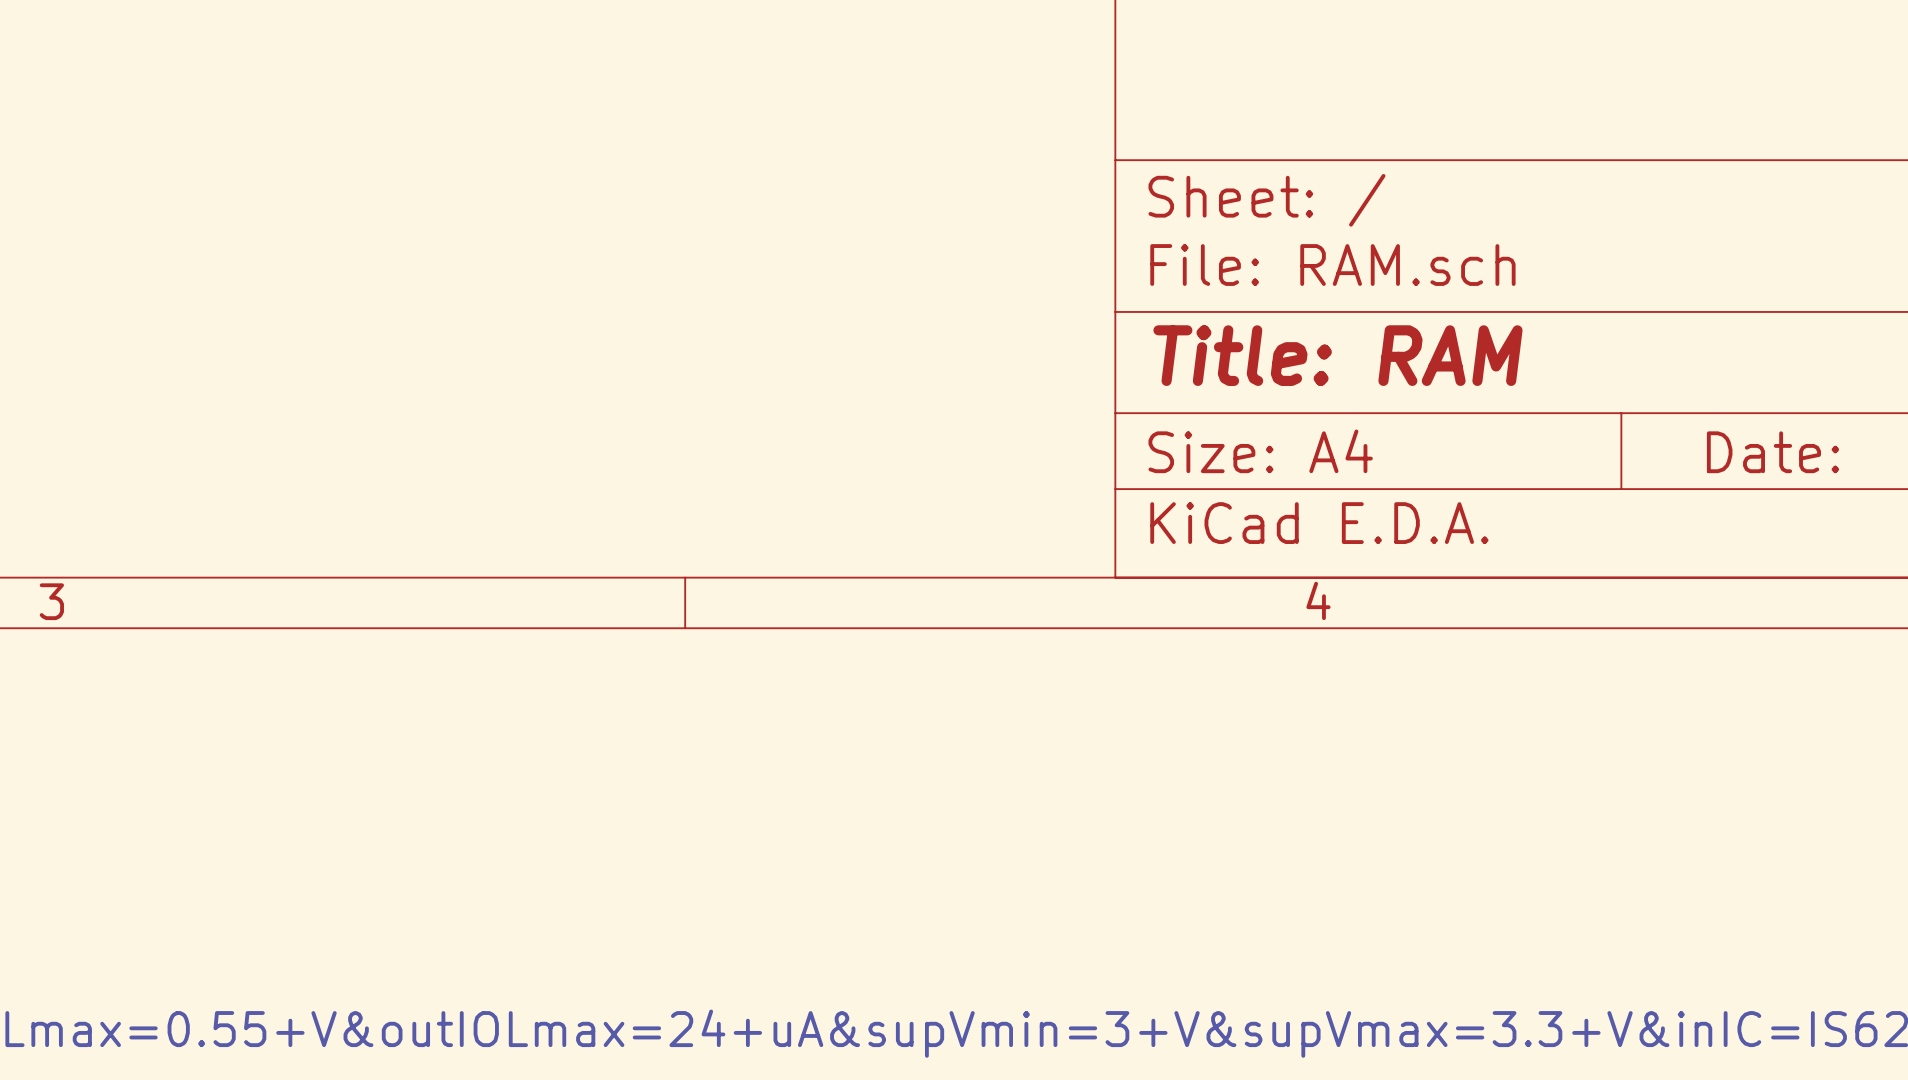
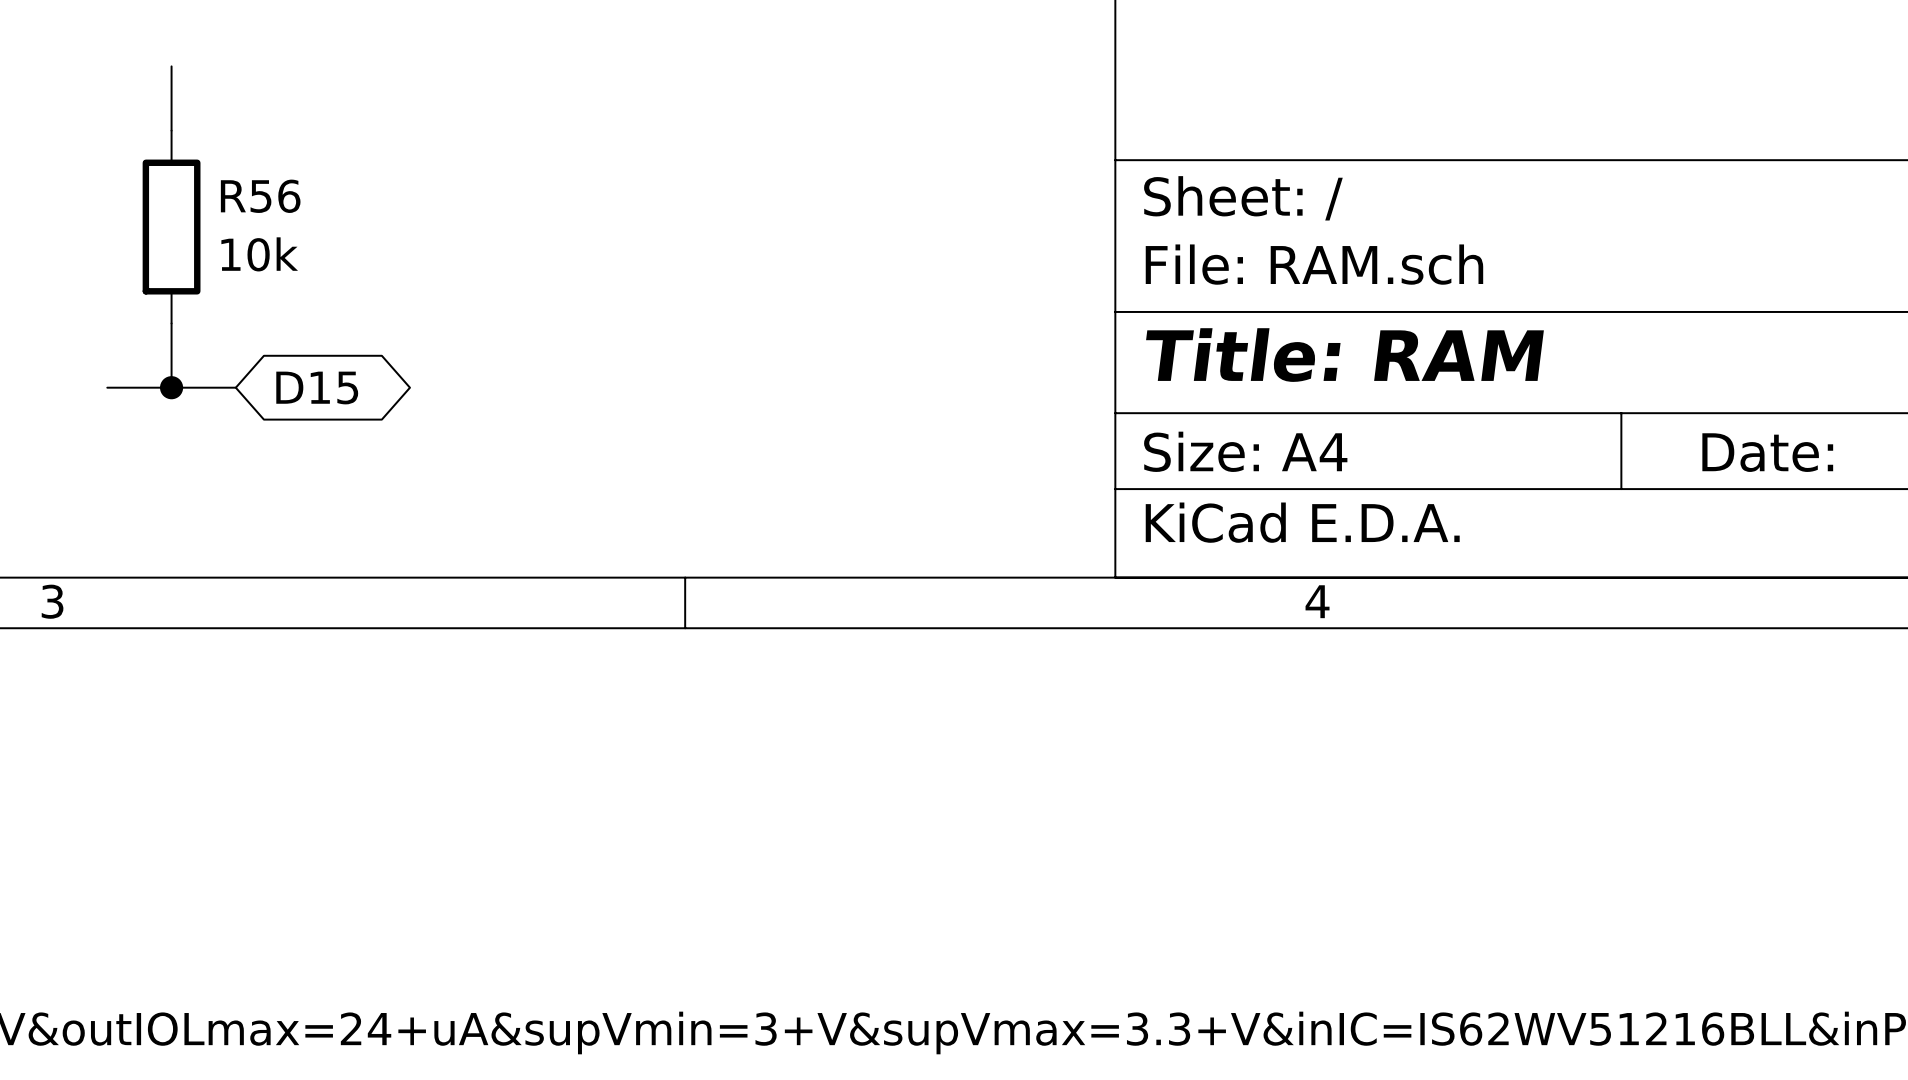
wire: none -> (171, 66) (171, 130)
R56: none -> 10k (171, 227)
wire: none -> (171, 323) (171, 387)
wire: none -> (107, 387) (235, 387)
junction: none -> (171, 387)
global label: none -> D15 (317, 388)

